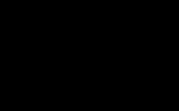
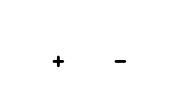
text: none -> + (58, 61)
text: none -> - (120, 61)

